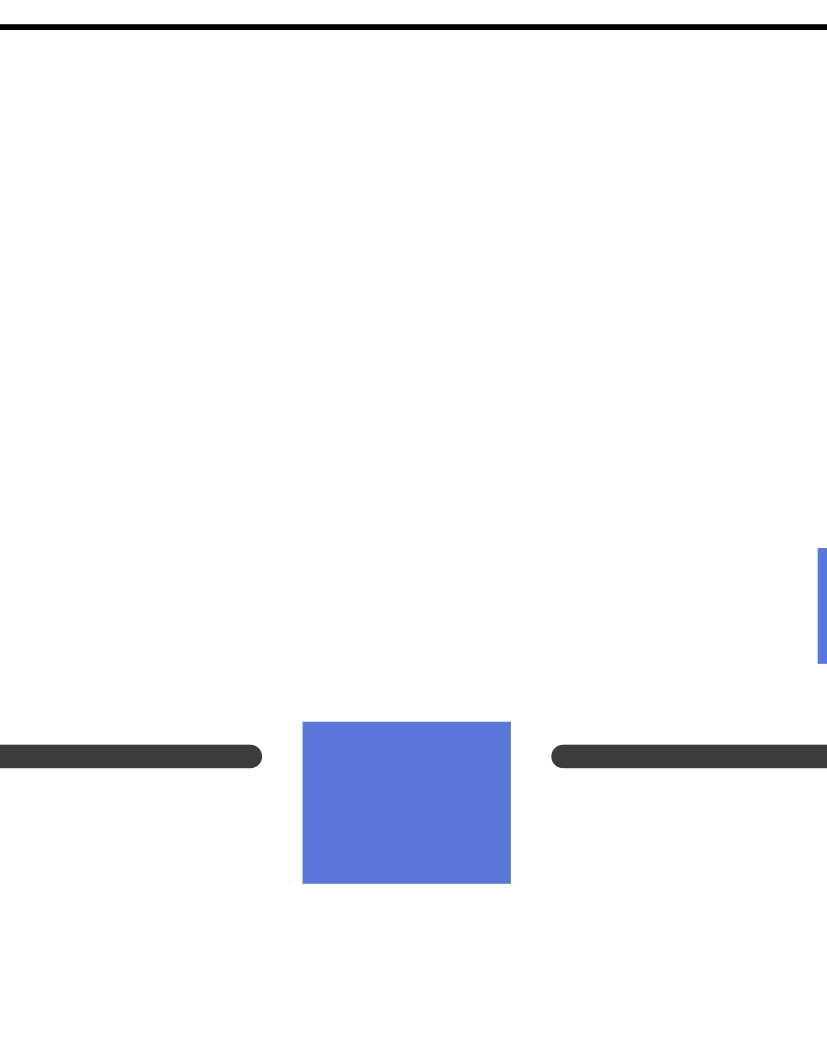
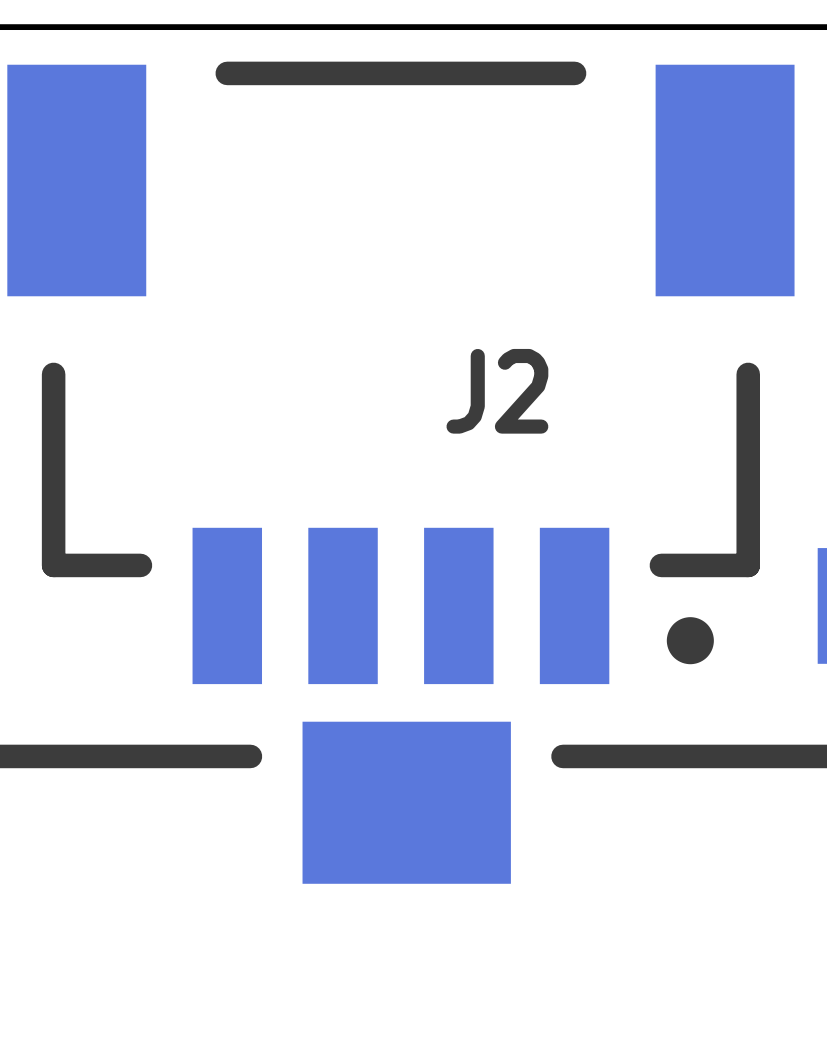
J2: none -> (400, 372)

